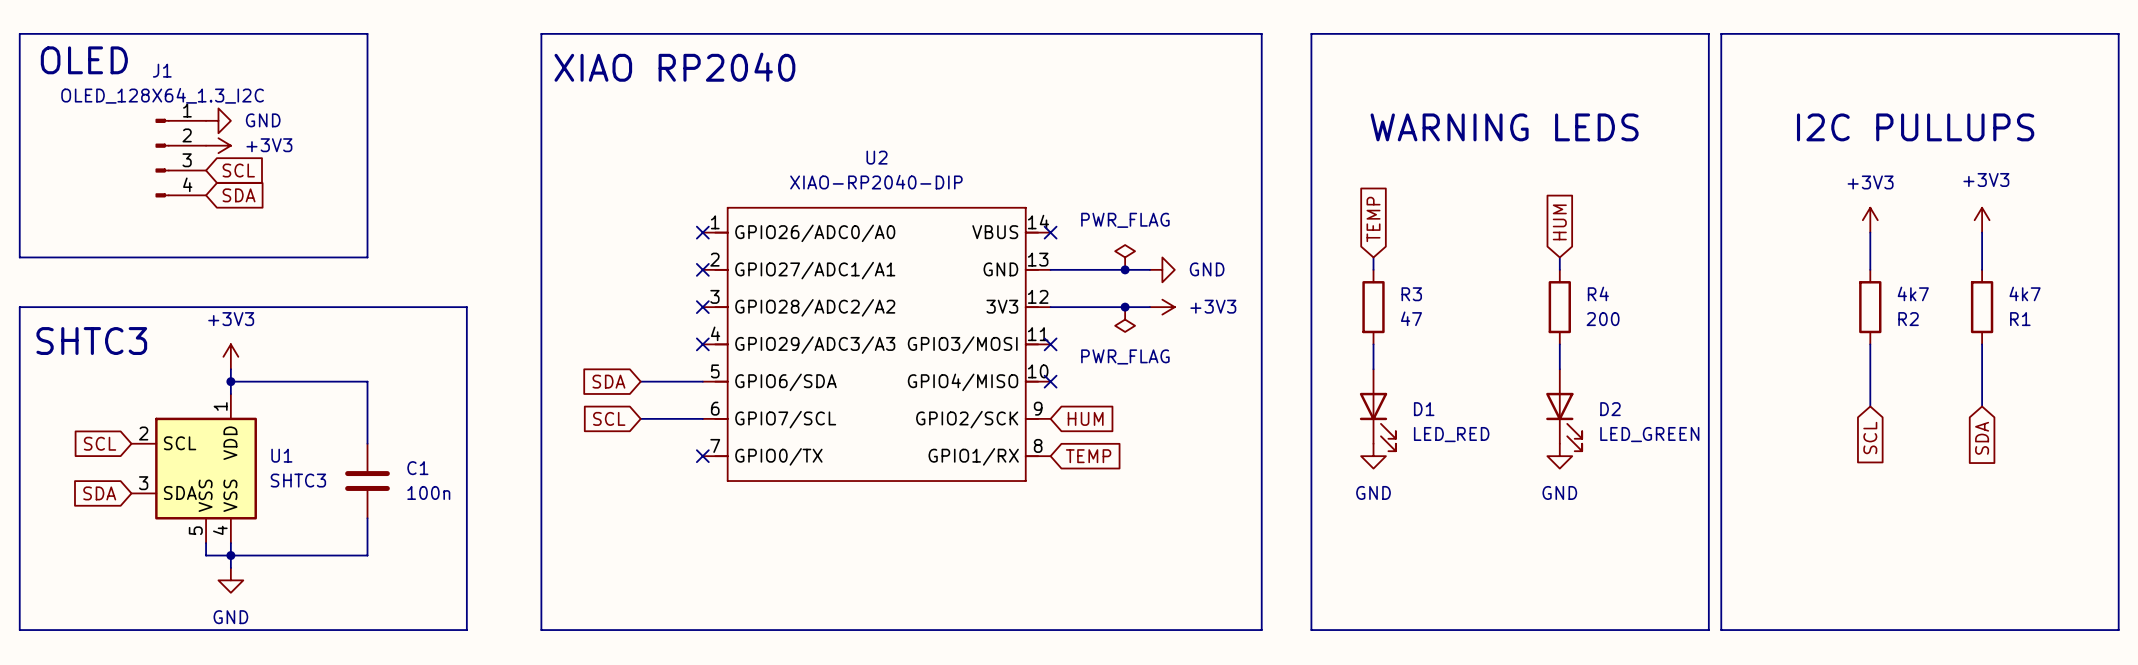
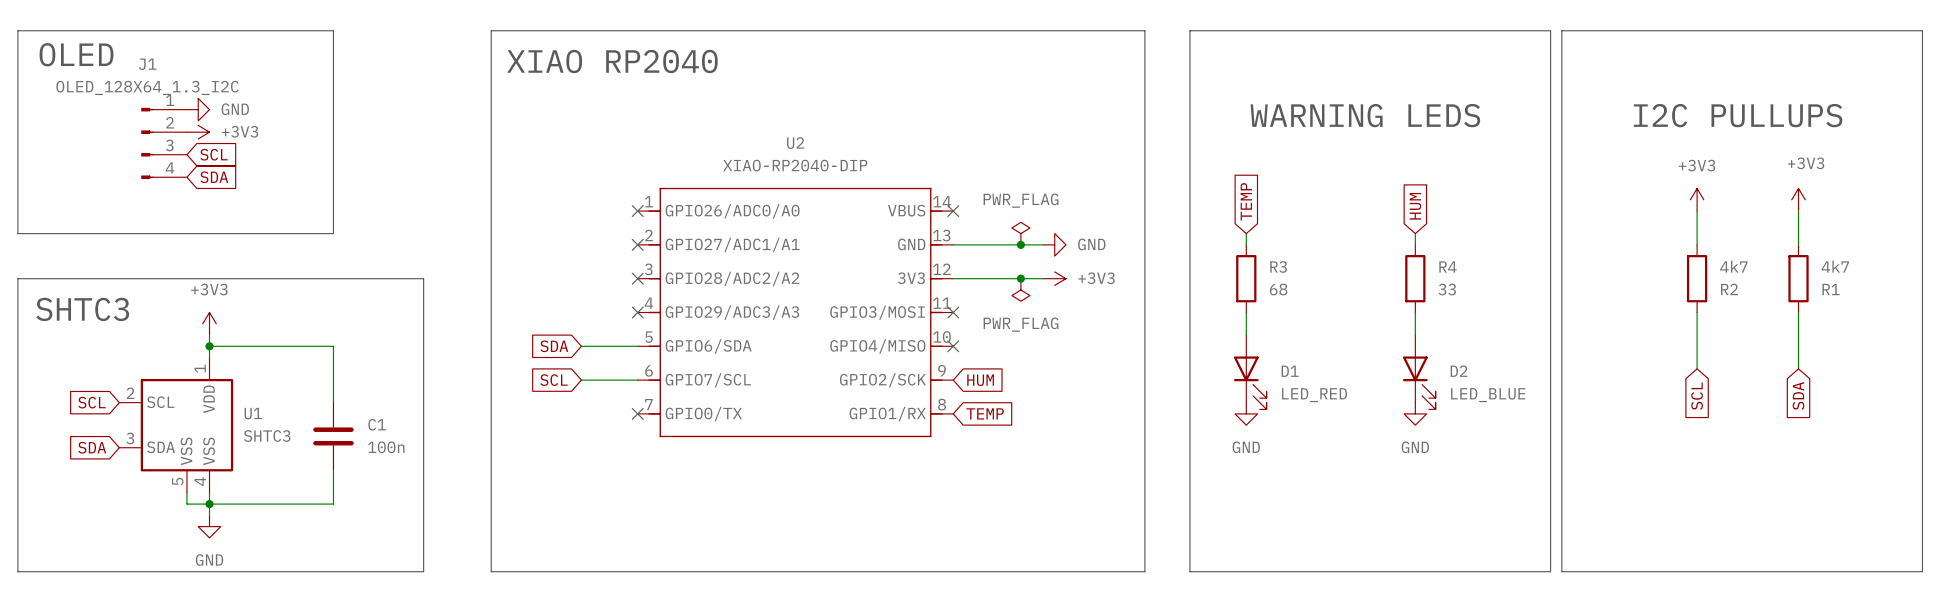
R3 value: 47 (1411, 318) -> 68 (1278, 289)
R4 value: 200 (1603, 319) -> 33 (1447, 289)
D2 value: LED_GREEN (1649, 434) -> LED_BLUE (1488, 395)

